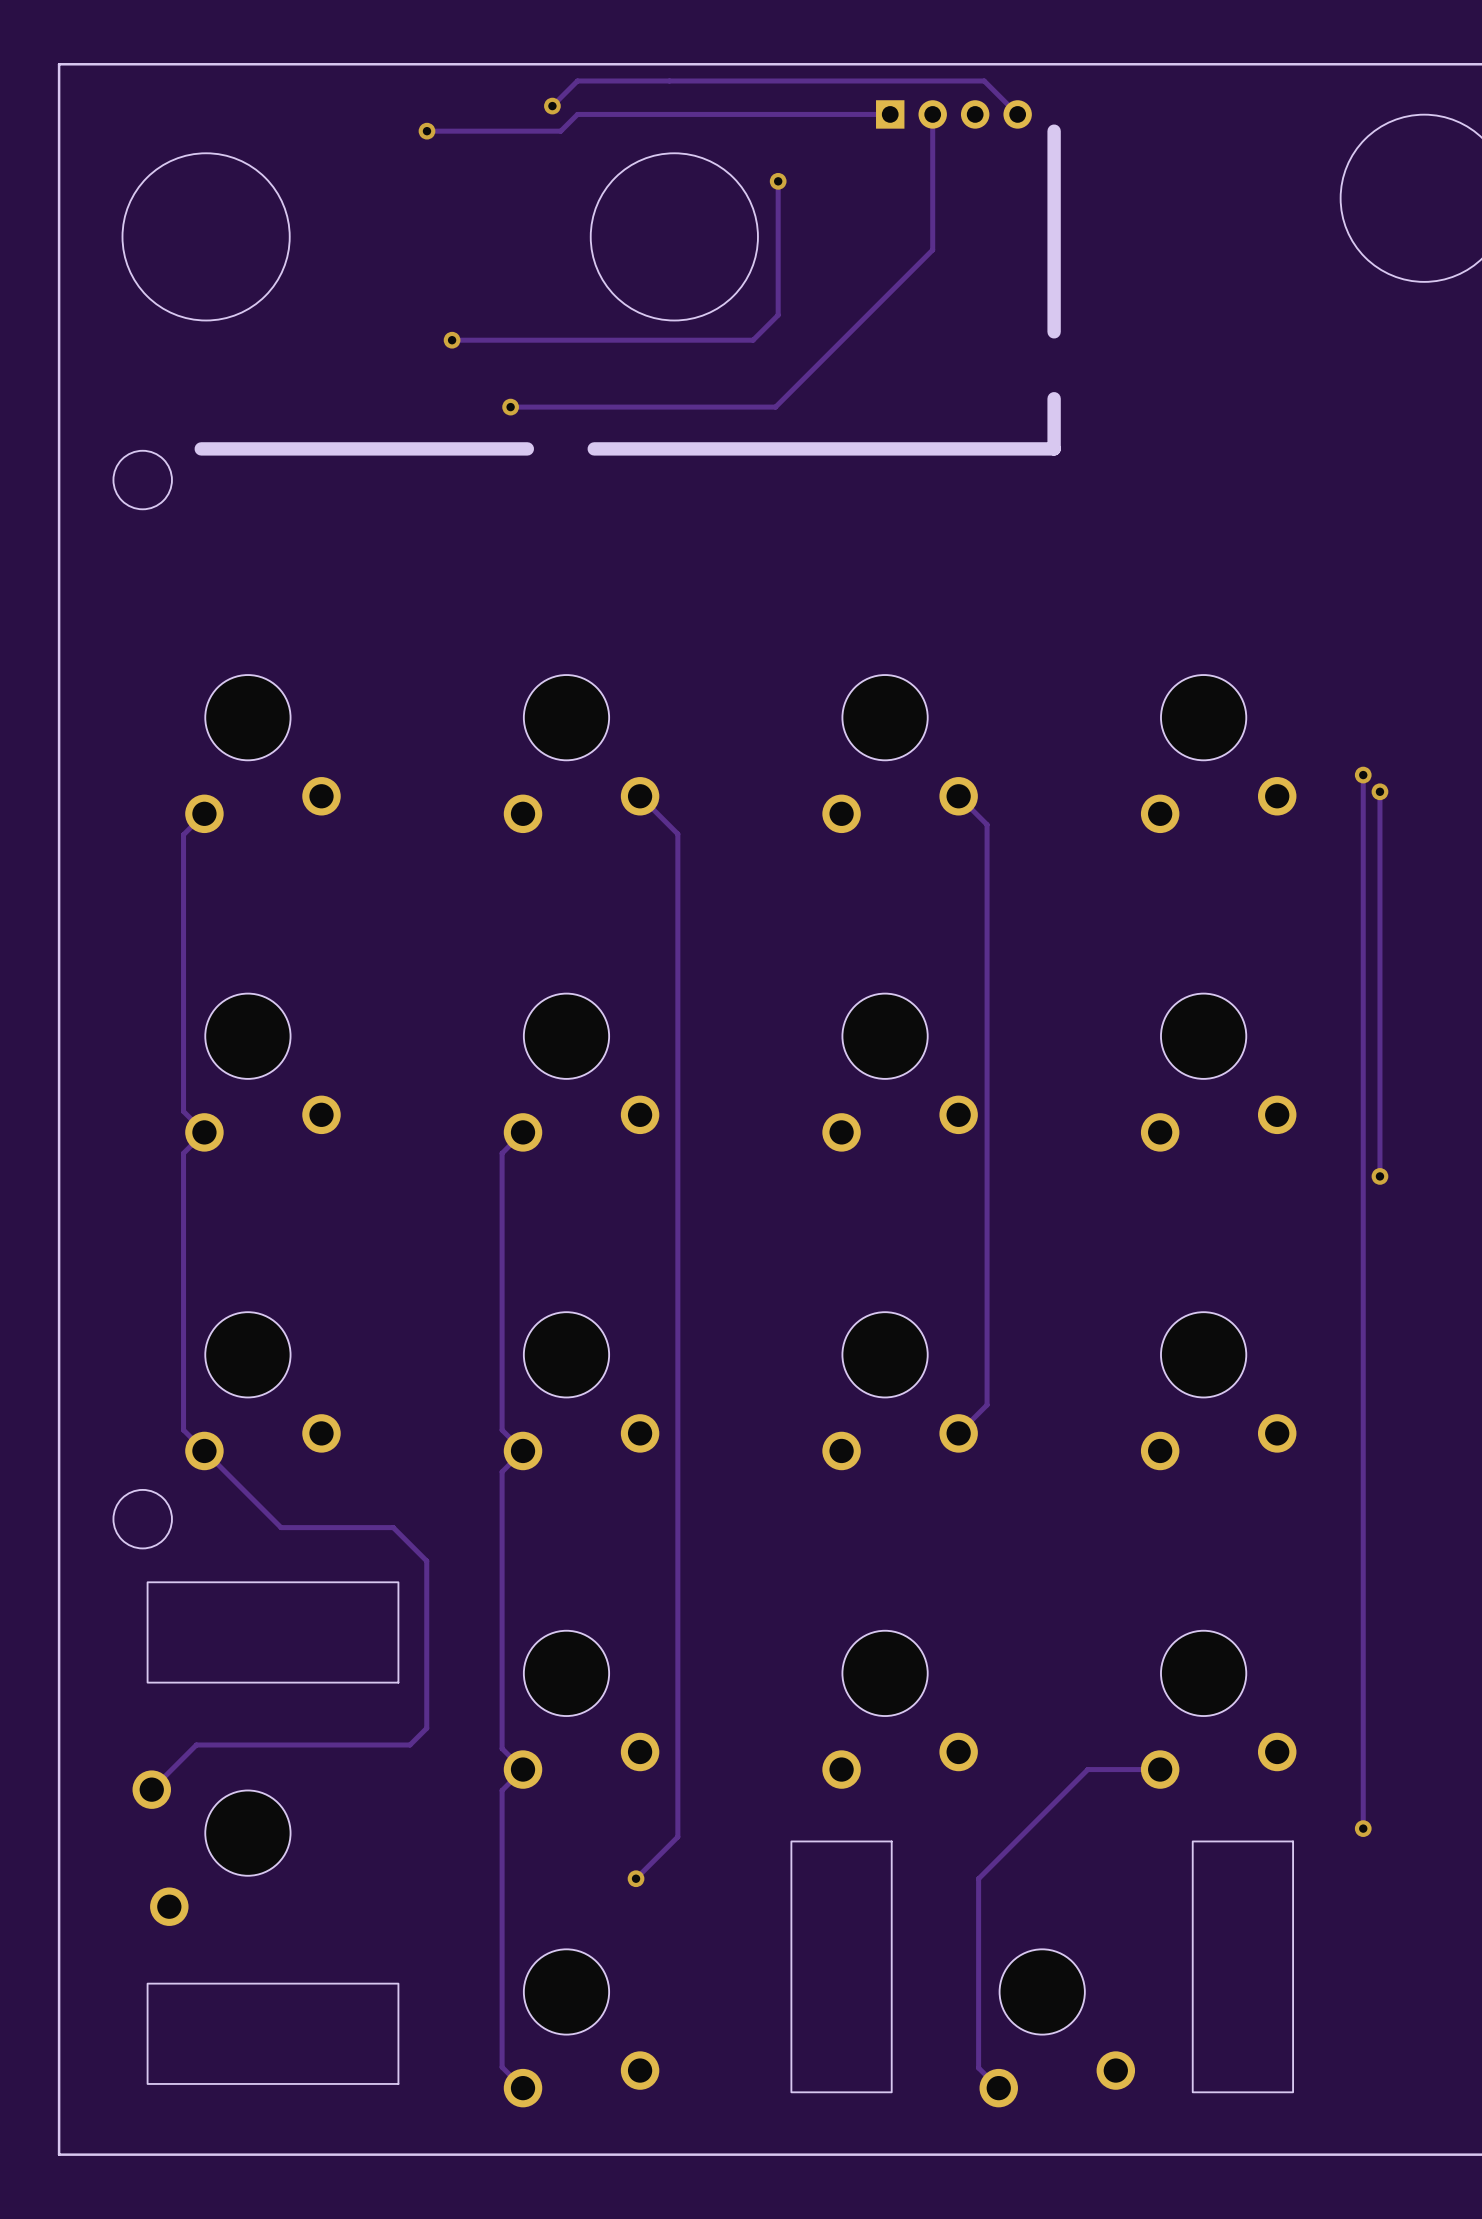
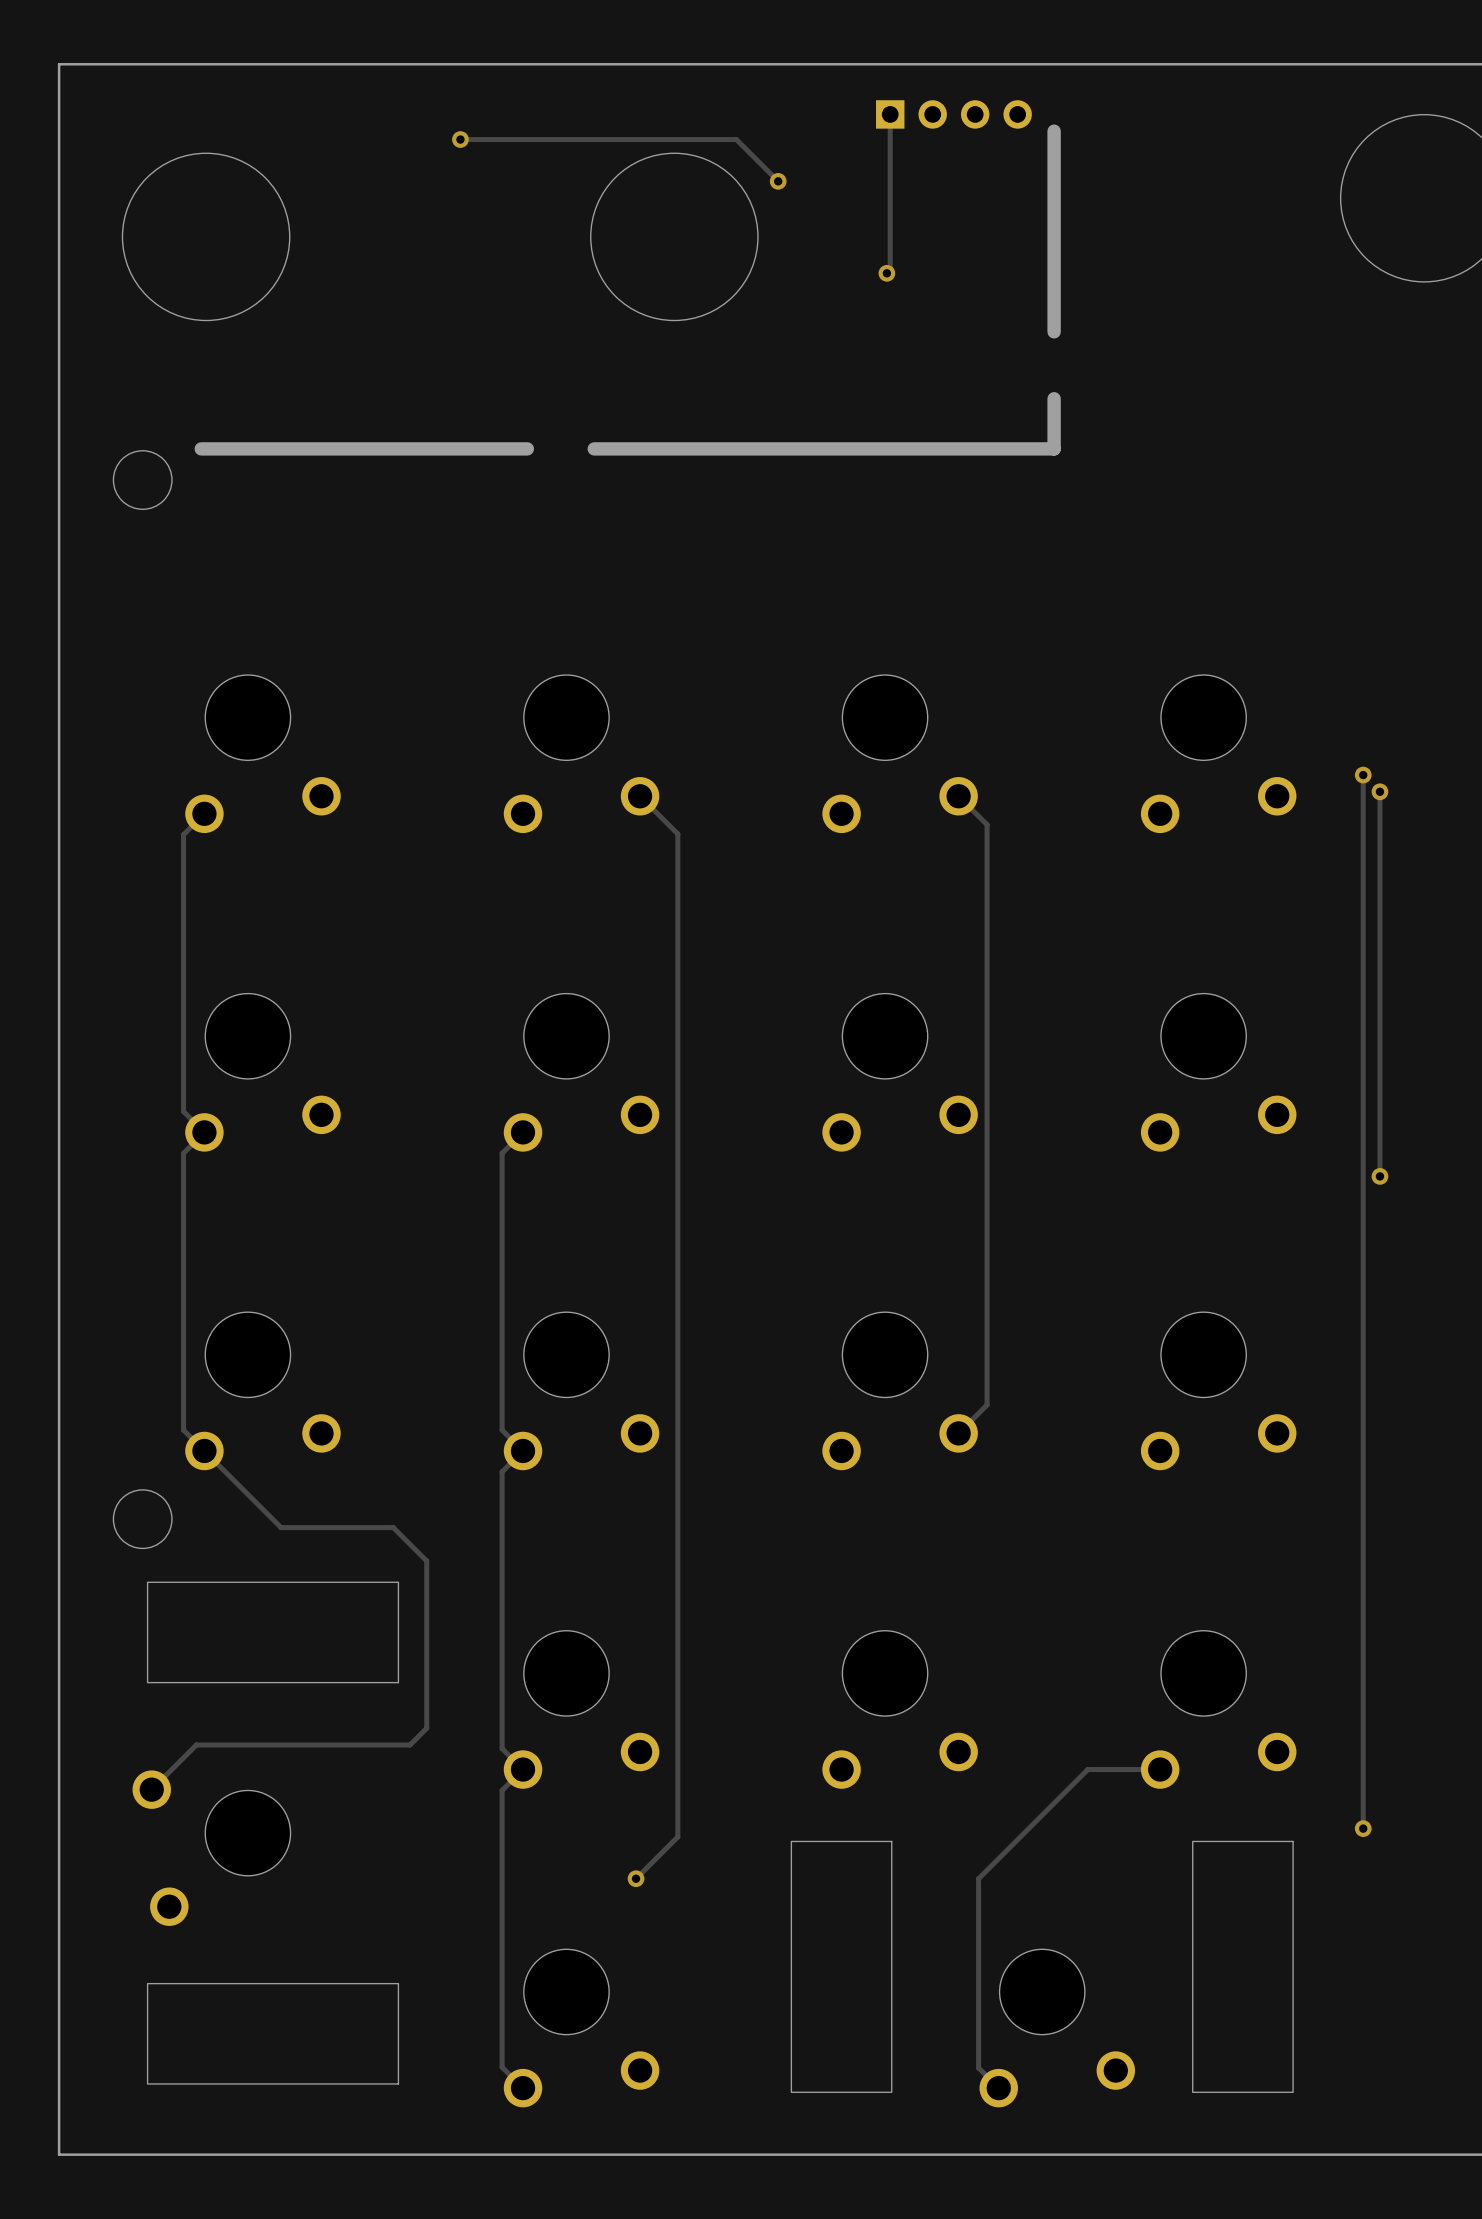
track: (552, 106) (577, 80) (984, 80) (1017, 114) -> none
via: (552, 106) -> none
track: (890, 114) (577, 114) (560, 131) (427, 131) -> (890, 114) (890, 269) (886, 273)
track: (932, 114) (932, 249) (775, 407) (510, 407) -> none
via position: (427, 131) -> (460, 139)
track: (778, 181) (778, 315) (753, 340) (452, 340) -> (778, 181) (736, 139) (460, 139)
via: none -> (886, 273)
via: (452, 340) -> none
via: (510, 407) -> none

